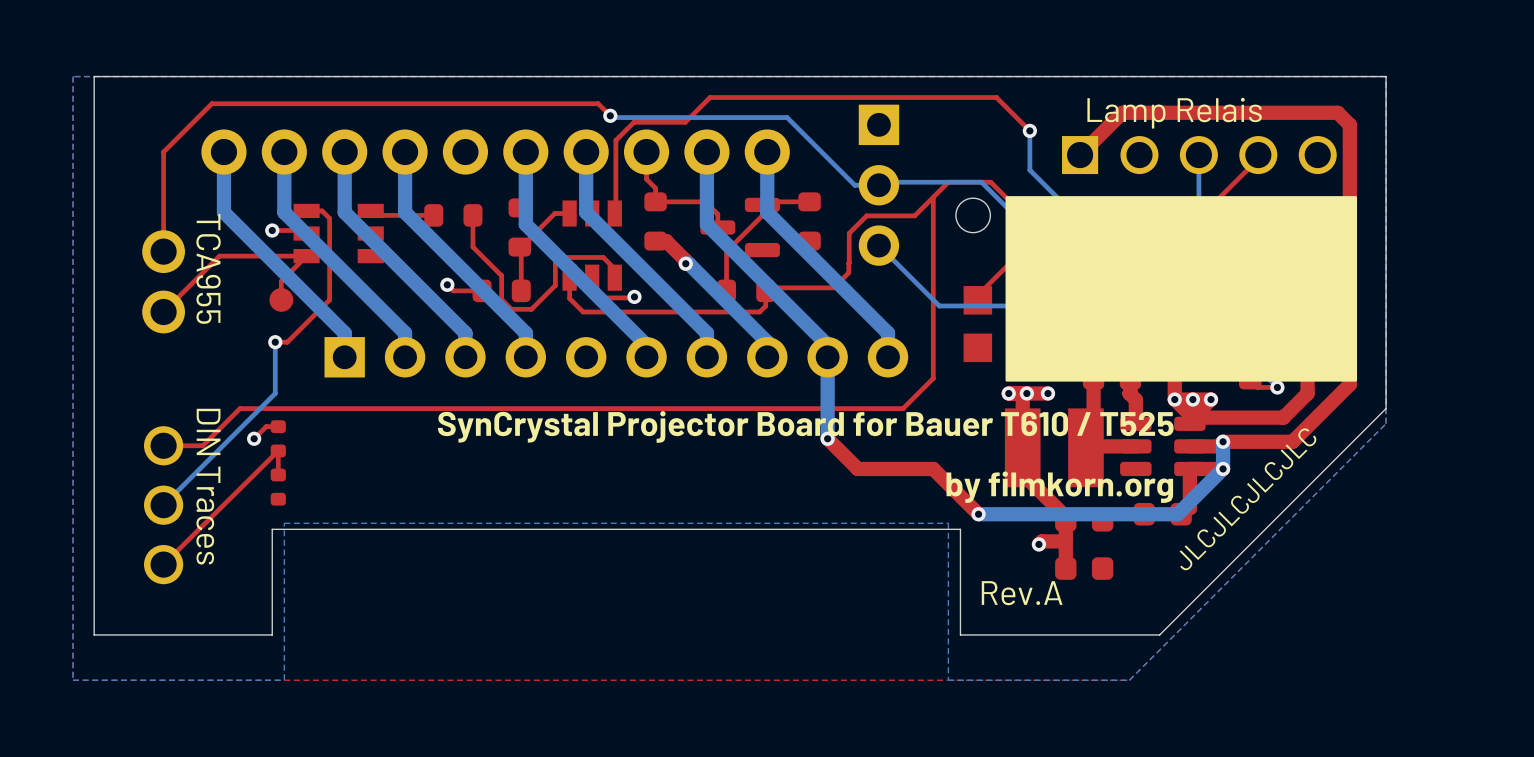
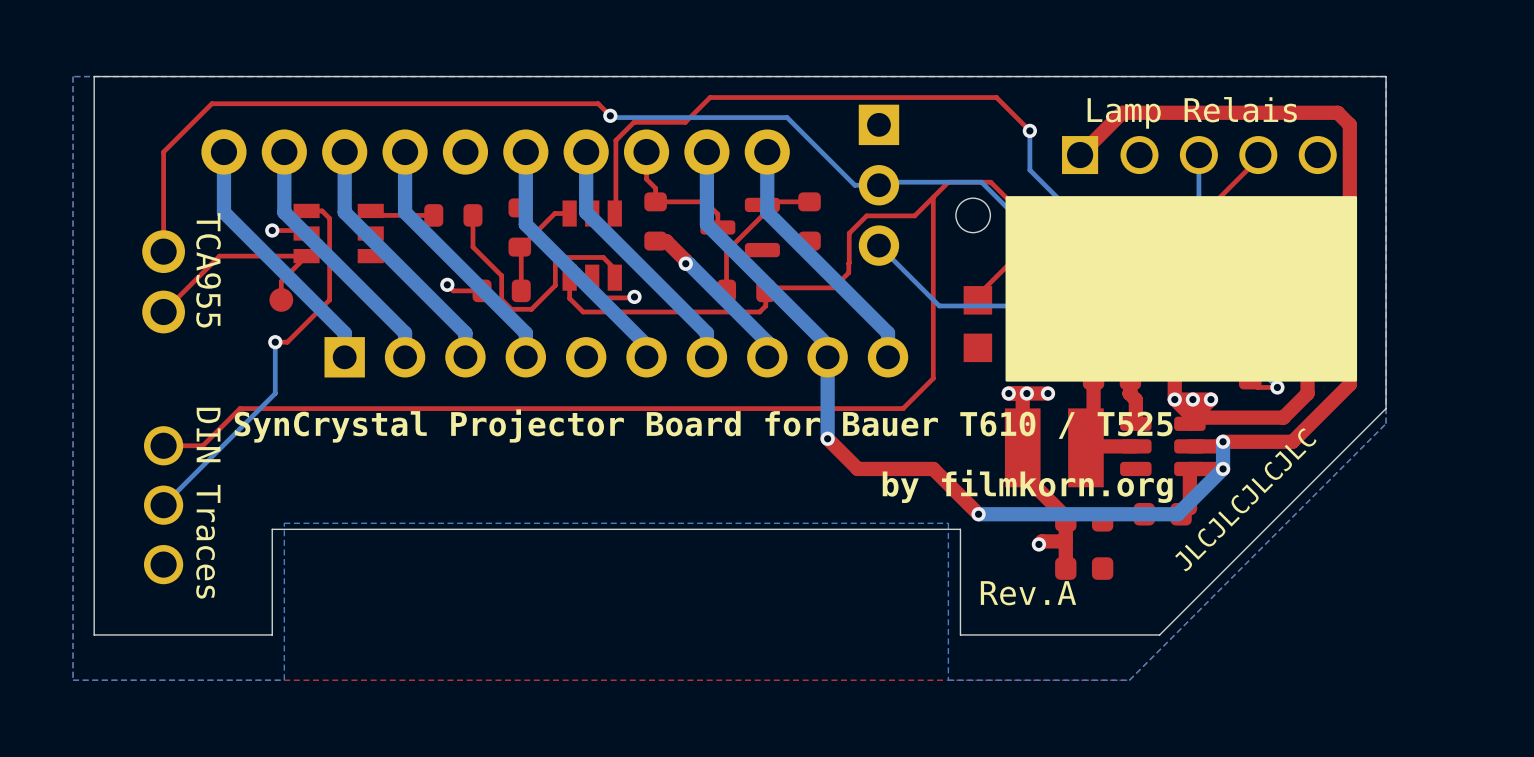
top track: (278, 426) (266, 426) (254, 438) -> none
via: (254, 438) -> none
part: (278, 438) -> none
top track: (278, 474) (278, 450) (163, 564) -> none
part: (278, 487) -> none

